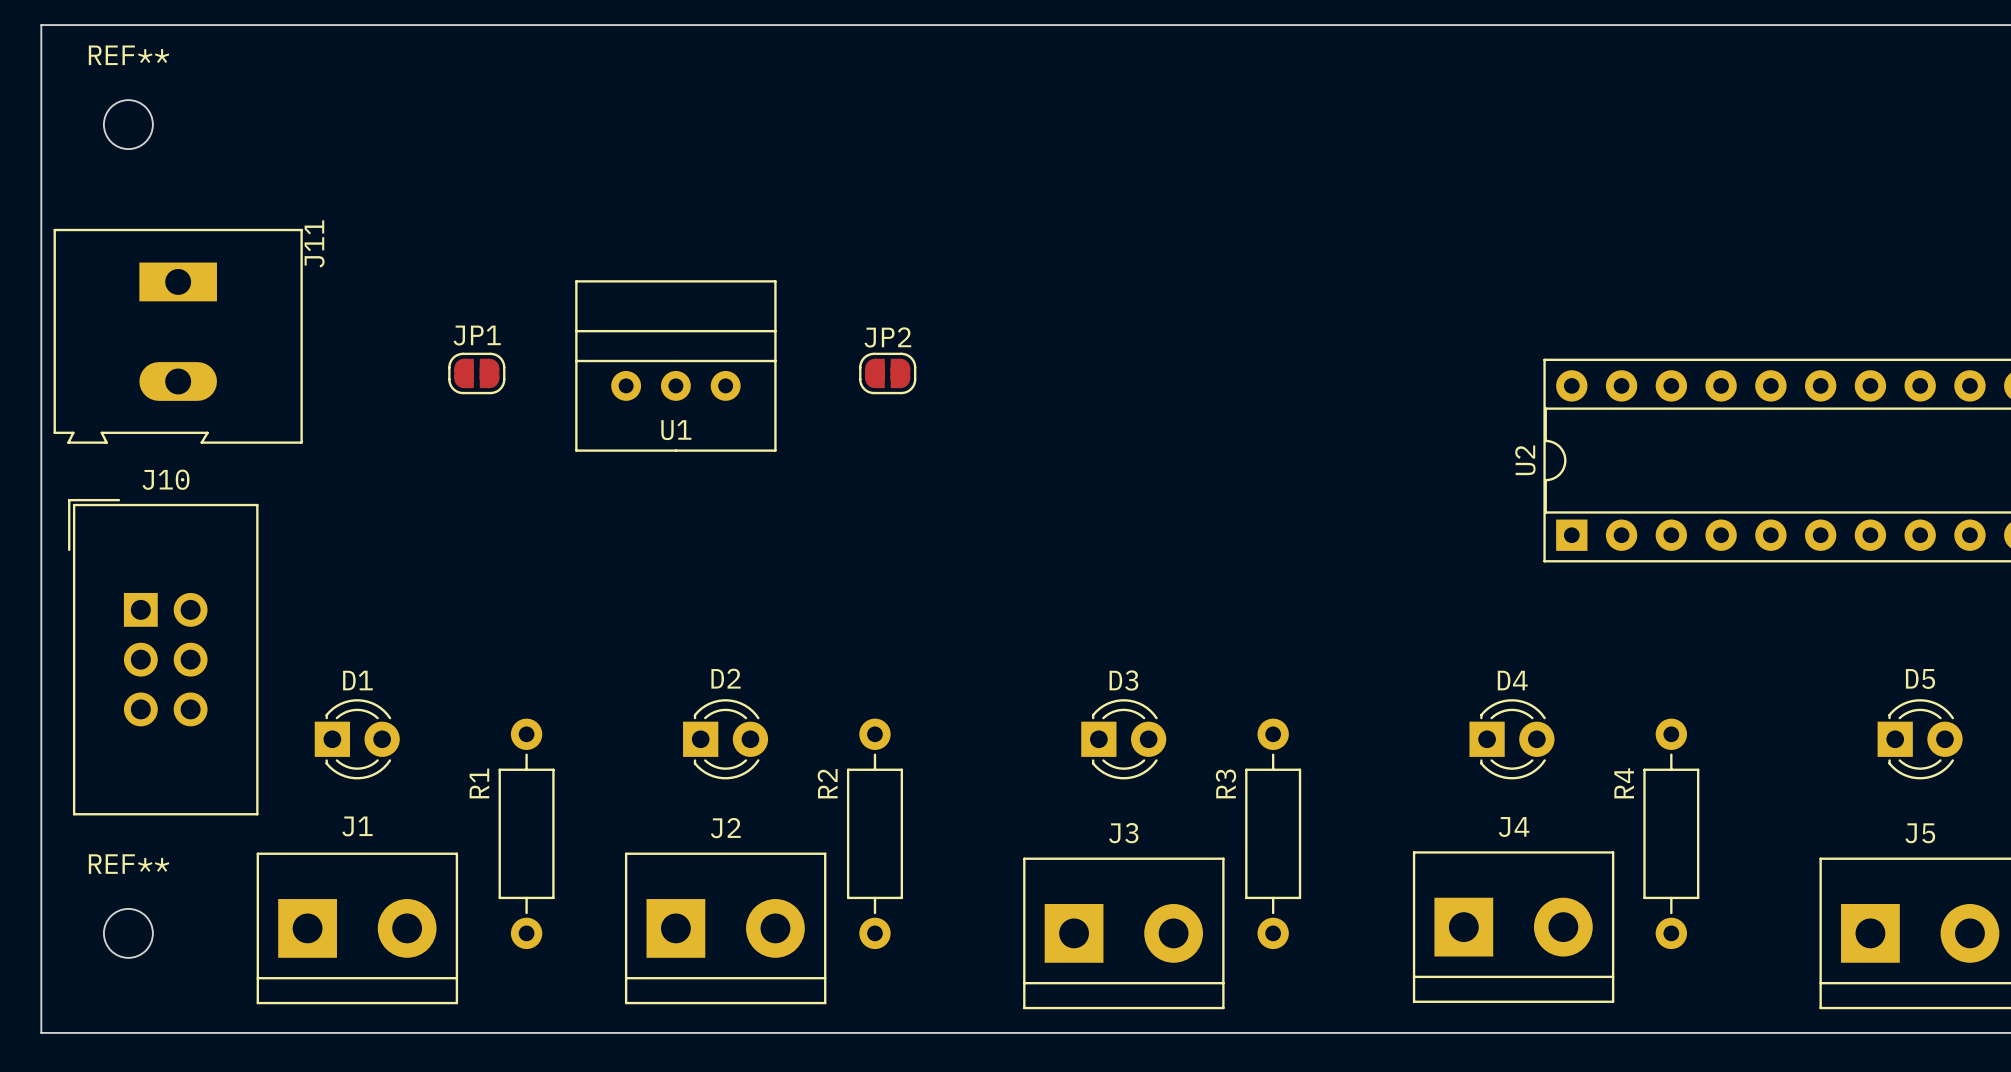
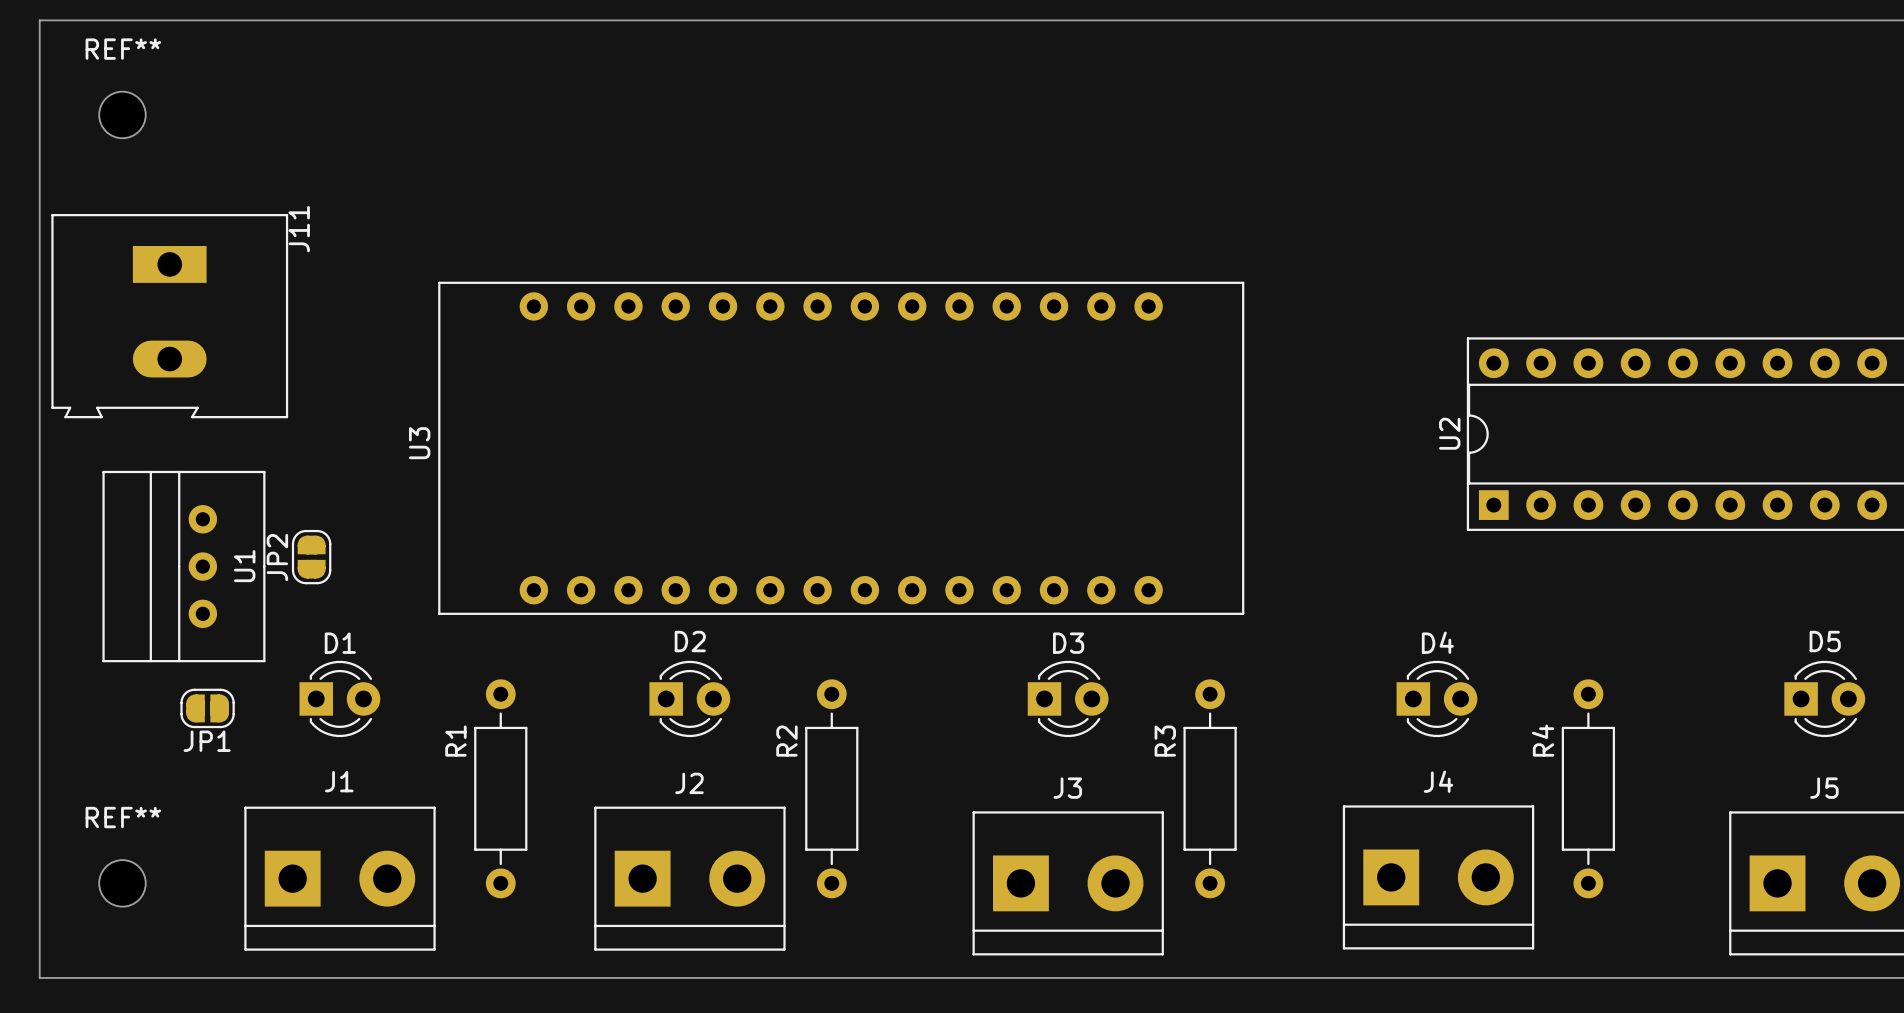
JP1 name position: JP1 (477, 335) -> JP1 (207, 741)
JP2 name position: JP2 (887, 337) -> JP2 (277, 557)
U1 rotation: 0° (675, 365) -> 90° counterclockwise (183, 566)
U1 position: (675, 365) -> (183, 566)
JP1 position: (476, 373) -> (207, 708)
JP2 rotation: 0° (887, 373) -> 90° clockwise (311, 557)
JP2 position: (887, 373) -> (311, 557)
U3: none -> (841, 448)
J10: (163, 657) -> none

